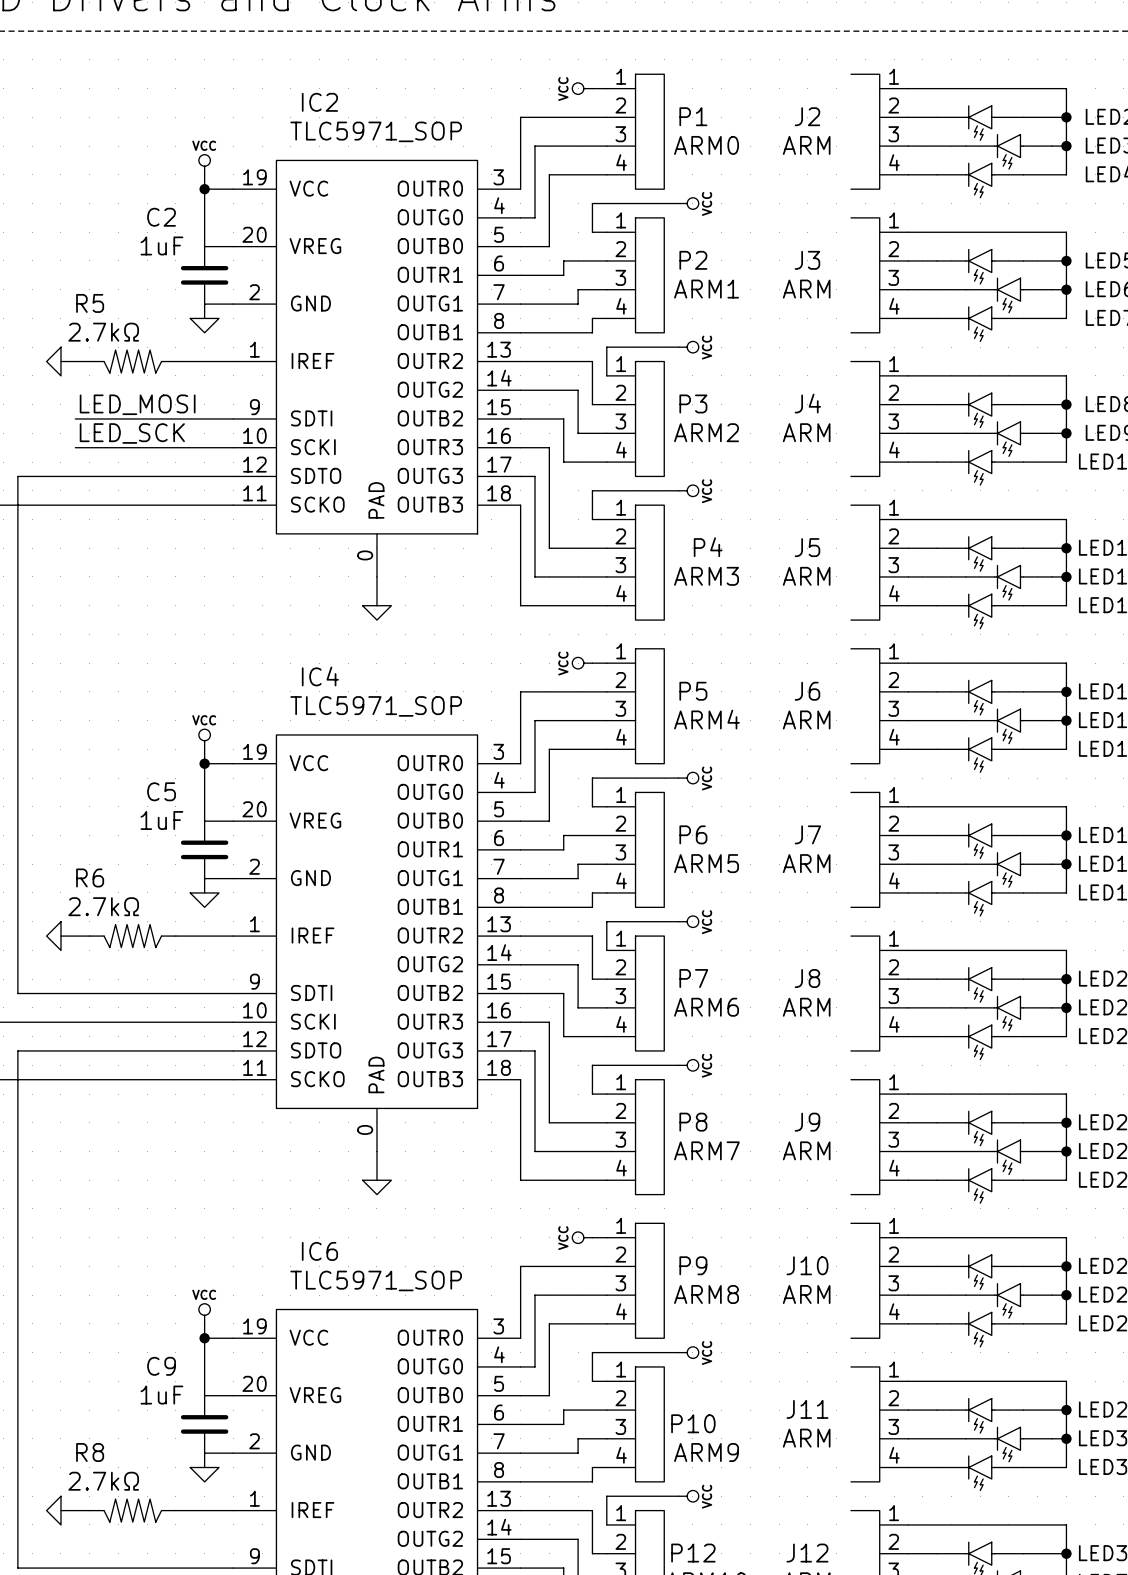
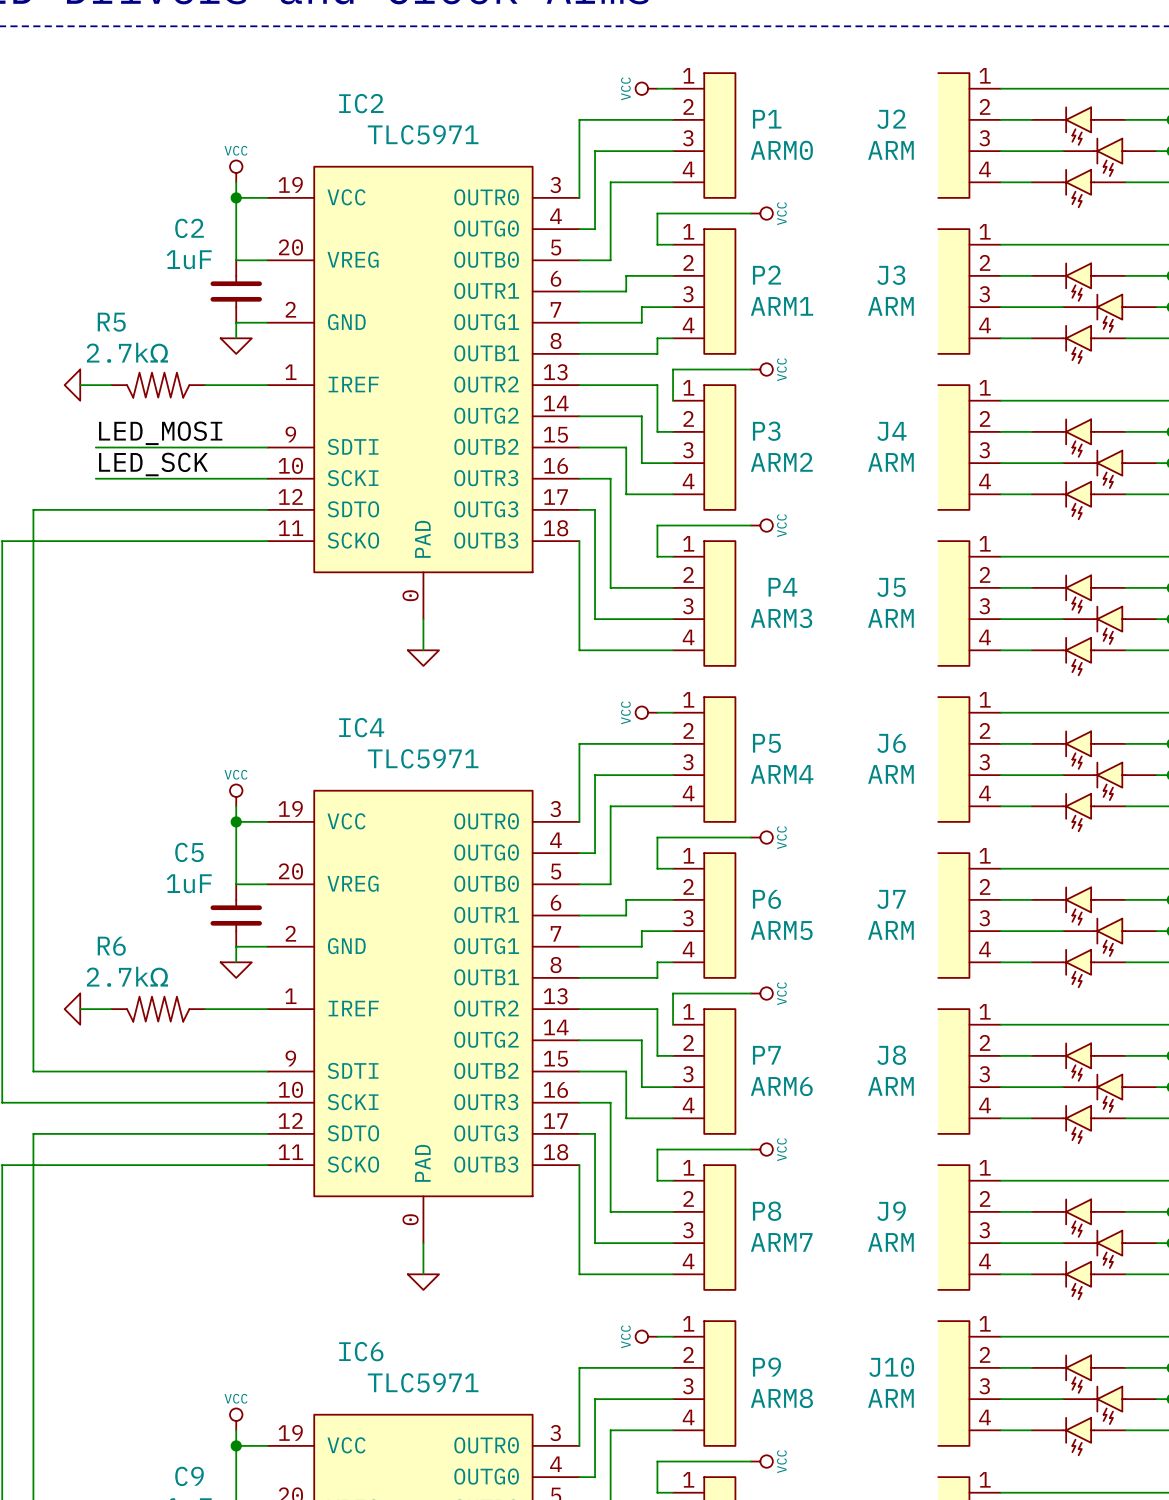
IC2 value: TLC5971_SOP (376, 131) -> TLC5971 (423, 134)
IC4 value: TLC5971_SOP (376, 706) -> TLC5971 (423, 758)
IC6 value: TLC5971_SOP (376, 1280) -> TLC5971 (423, 1382)

